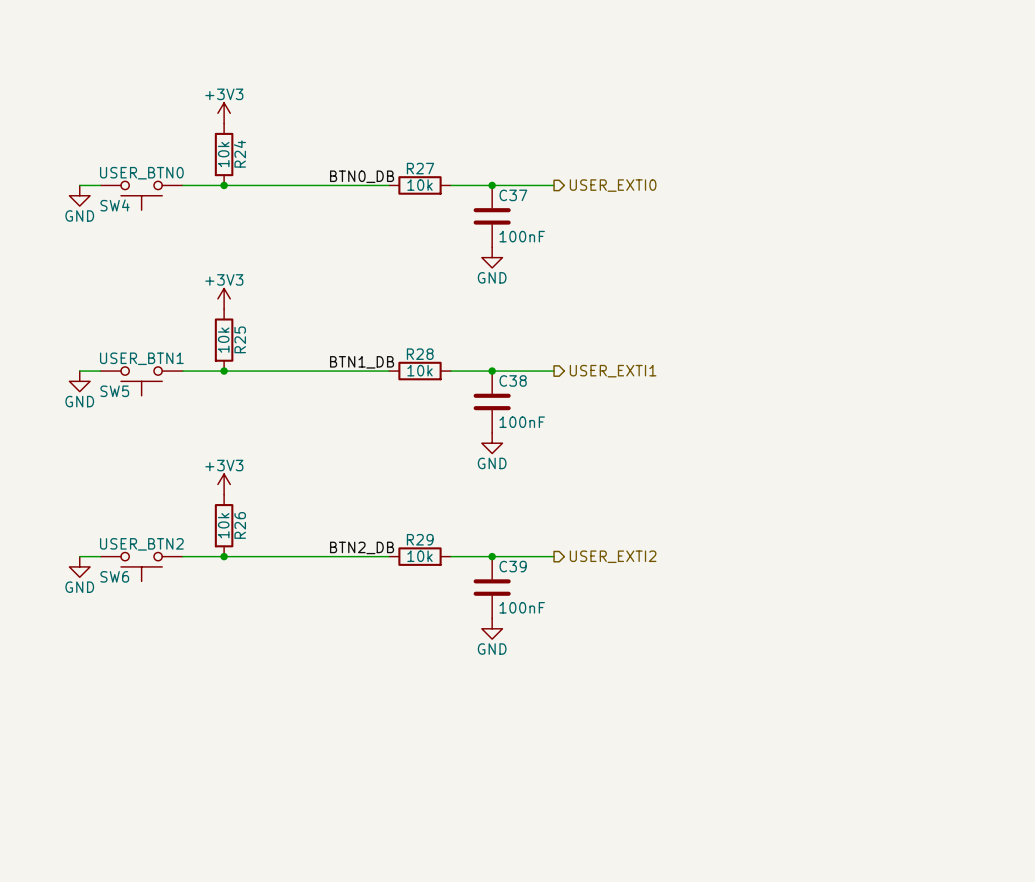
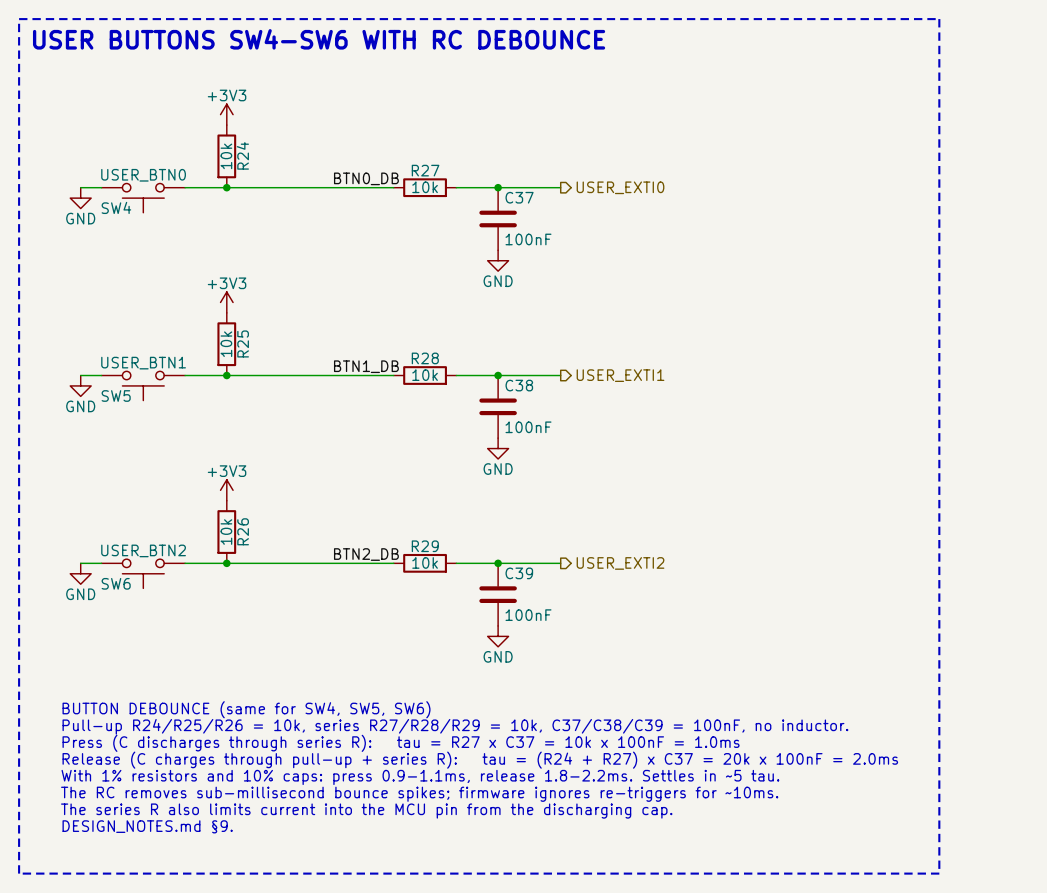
line: none -> (19, 19) (939, 19) (939, 873) (19, 873) (19, 19)
text: none -> USER BUTTONS SW4-SW6 WITH RC DEBOUNCE (319, 39)
text: none -> BUTTON DEBOUNCE (same for SW4, SW5, SW6) (246, 709)
text: none -> Pull-up R24/R25/R26 = 10k, series R27/R28/R29 = 10k, C37/C38/C39 = 100nF, no inductor. (455, 726)
text: none -> Press (C discharges through series R): tau = R27 x C37 = 10k x 100nF = 1.0ms (401, 743)
text: none -> Release (C charges through pull-up + series R): tau = (R24 + R27) x C37 = 20k x 100nF = 2.0ms (480, 760)
text: none -> With 1% resistors and 10% caps: press 0.9-1.1ms, release 1.8-2.2ms. Settles in ~5 tau. (420, 777)
text: none -> The RC removes sub-millisecond bounce spikes; firmware ignores re-triggers for ~10ms. (419, 794)
text: none -> The series R also limits current into the MCU pin from the discharging cap. (366, 811)
text: none -> DESIGN_NOTES.md §9. (147, 826)

